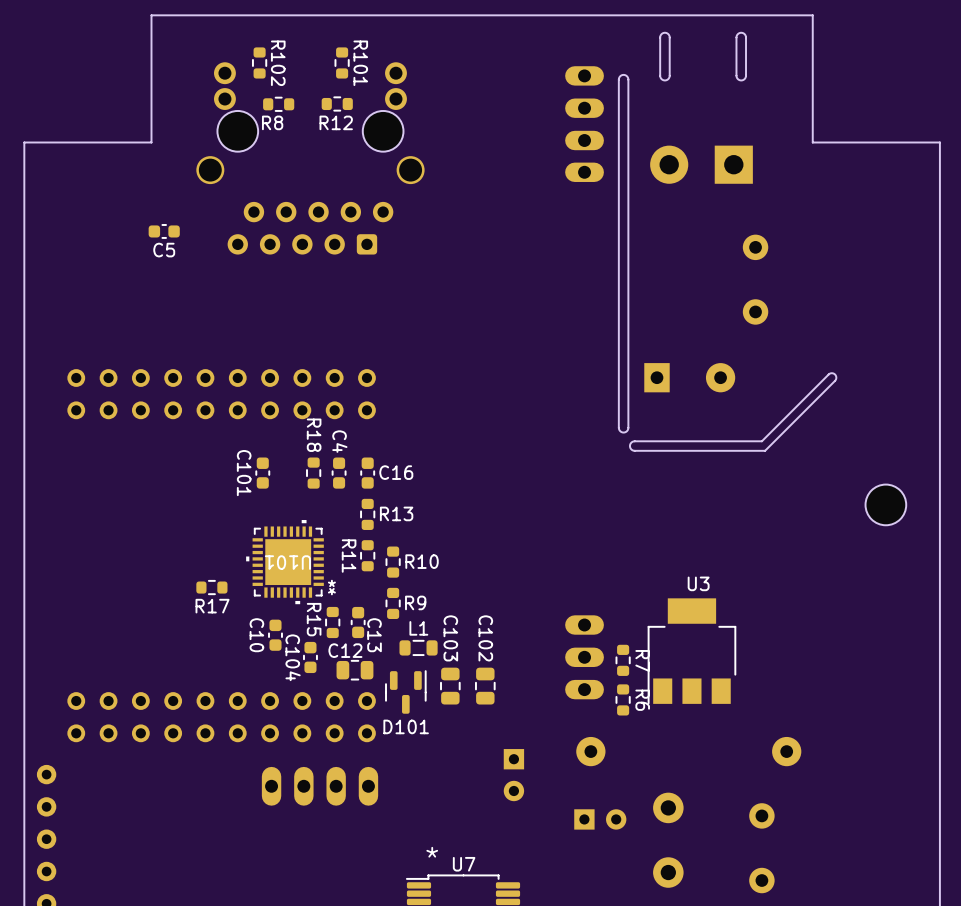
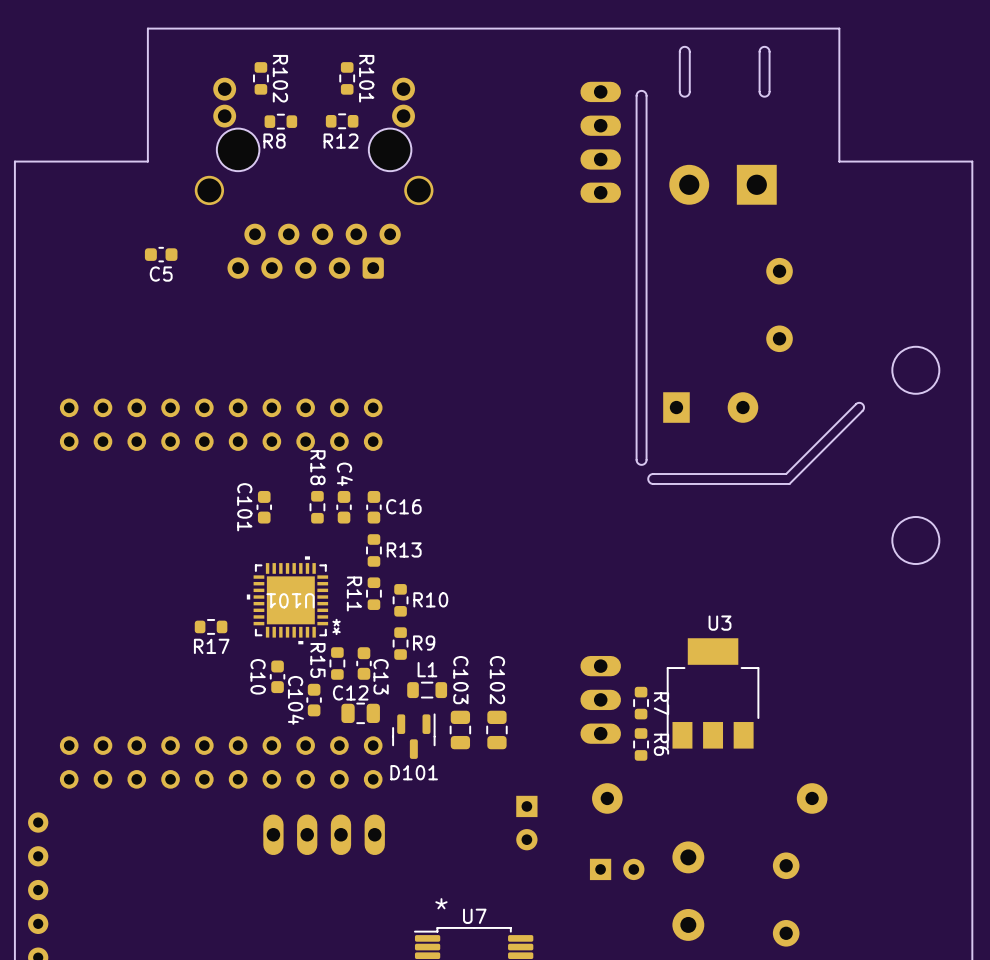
round board edge: none -> [891, 346, 940, 395]
round board edge: none -> [891, 516, 940, 565]
part: (885, 504) -> none

